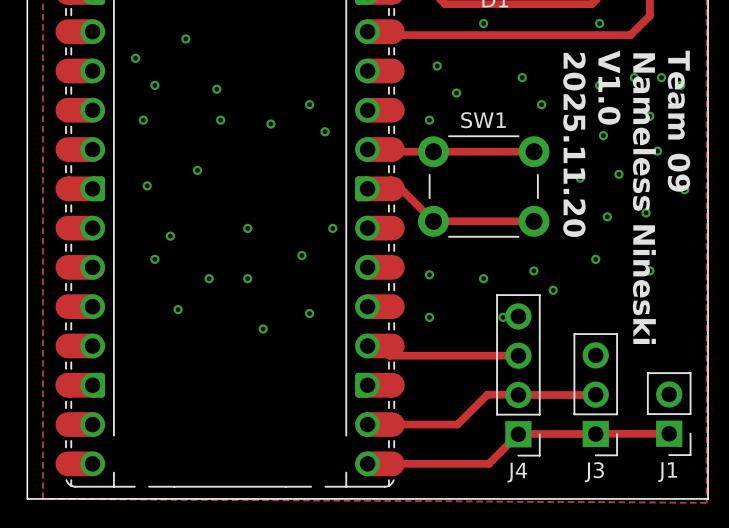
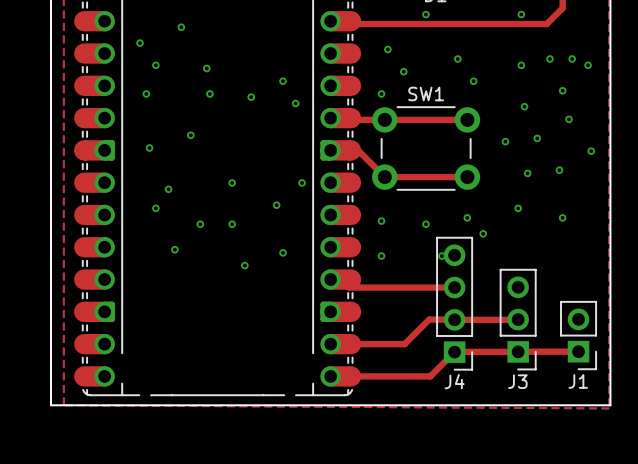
text: V1.0 (609, 87) -> none
text: Team 09 (678, 121) -> none
text: 2025.11.20 (574, 144) -> none
text: Nameless Nineski (644, 198) -> none

